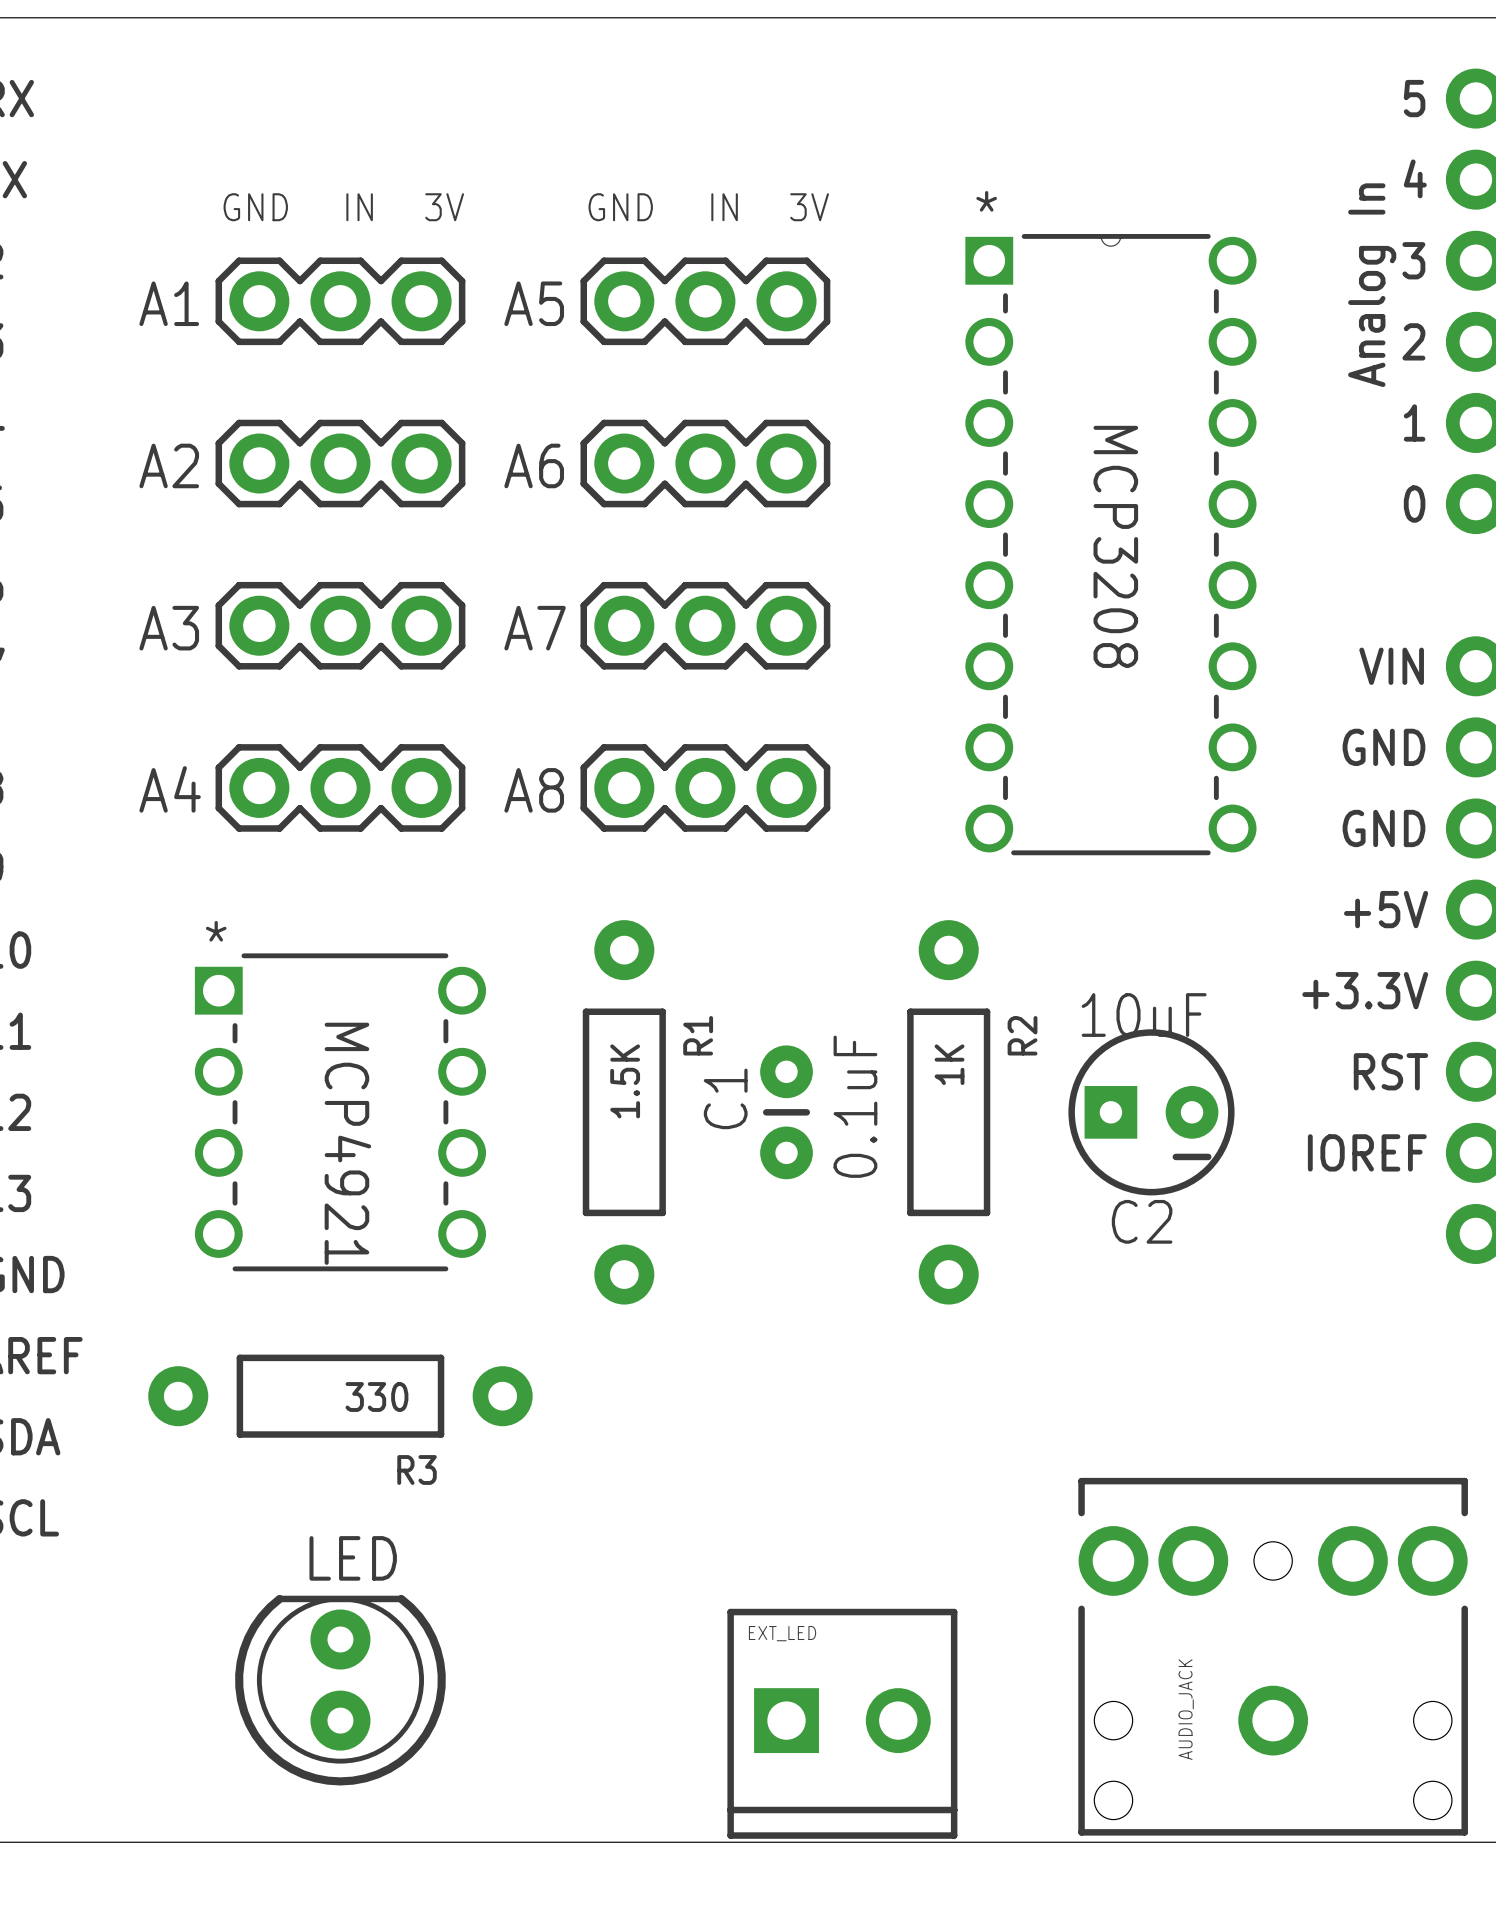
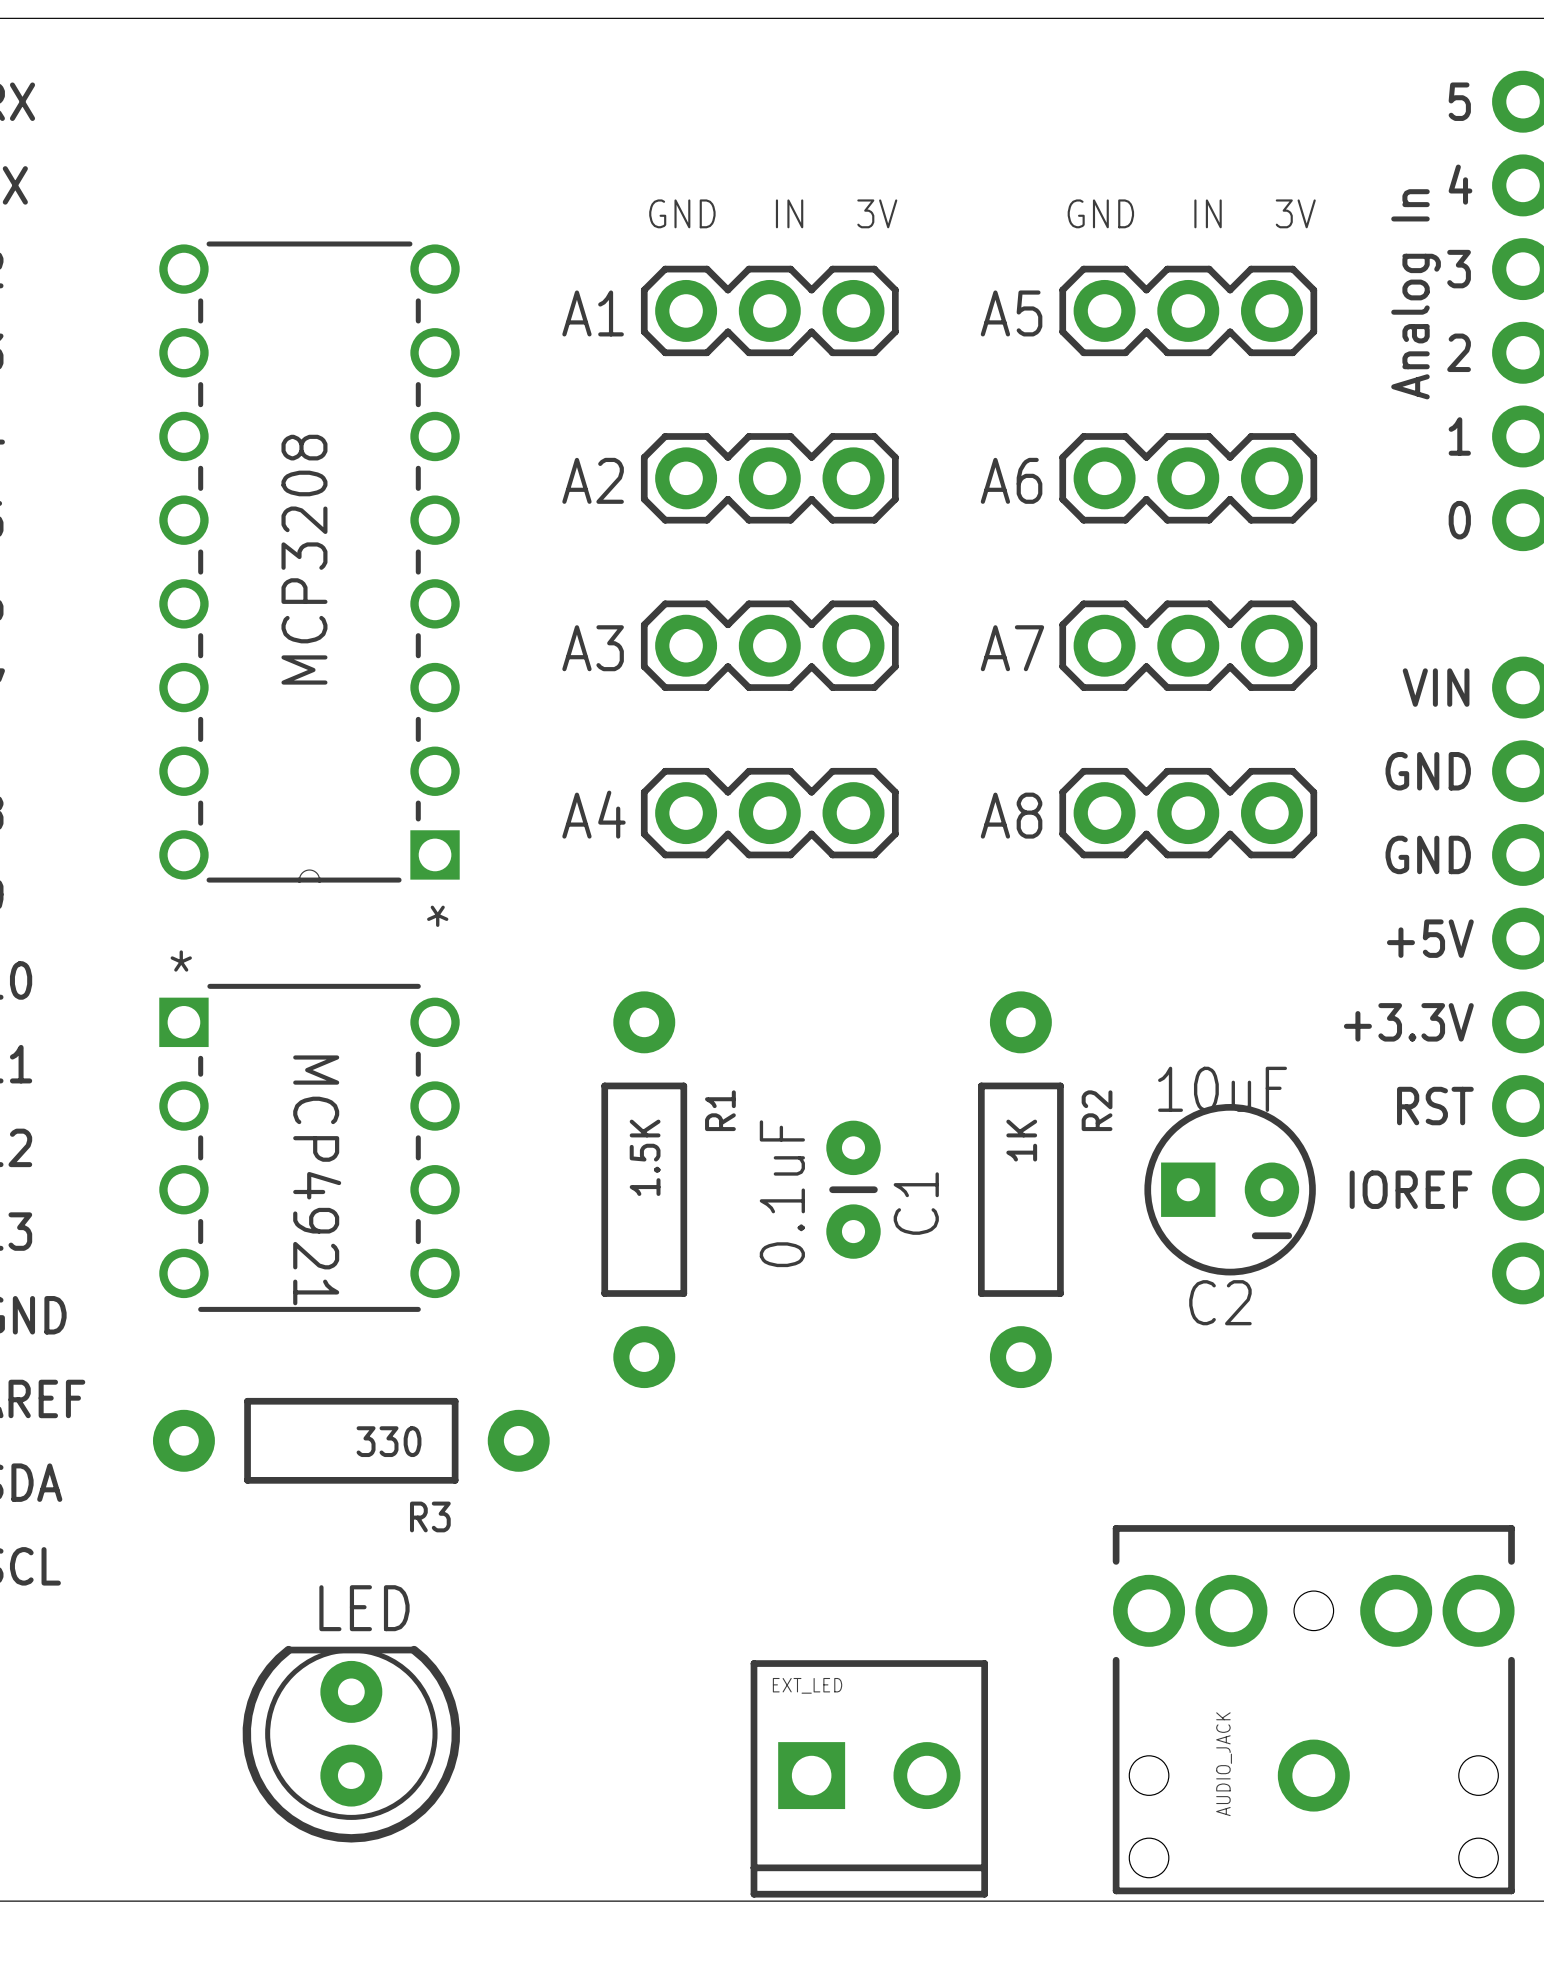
text: GND (255, 207) -> none
text: IN (359, 207) -> none
text: 3V (444, 207) -> none
text position: GND (620, 207) -> GND (682, 213)
text position: IN (724, 207) -> IN (789, 213)
text position: 3V (809, 207) -> 3V (877, 213)
text: none -> GND (1100, 213)
text: none -> IN (1208, 213)
text: none -> 3V (1295, 213)
A1 position: (340, 301) -> (769, 310)
A5 position: (705, 301) -> (1188, 310)
A2 position: (340, 463) -> (769, 478)
A6 position: (705, 463) -> (1188, 478)
MCP3208 rotation: 0° (1110, 544) -> 180° (309, 562)
MCP3208 position: (1110, 544) -> (309, 562)
A3 position: (340, 625) -> (769, 645)
A7 position: (705, 625) -> (1188, 645)
A4 position: (340, 787) -> (769, 813)
A8 position: (705, 787) -> (1188, 813)
C1 name position: C1 (725, 1098) -> C1 (916, 1203)
C1 value position: 0.1uF (855, 1106) -> 0.1uF (782, 1193)
MCP4921 position: (340, 1112) -> (309, 1147)
R1 position: (624, 1112) -> (644, 1189)
C1 position: (786, 1112) -> (853, 1189)
R2 position: (948, 1112) -> (1020, 1189)
C2 position: (1151, 1112) -> (1230, 1189)

